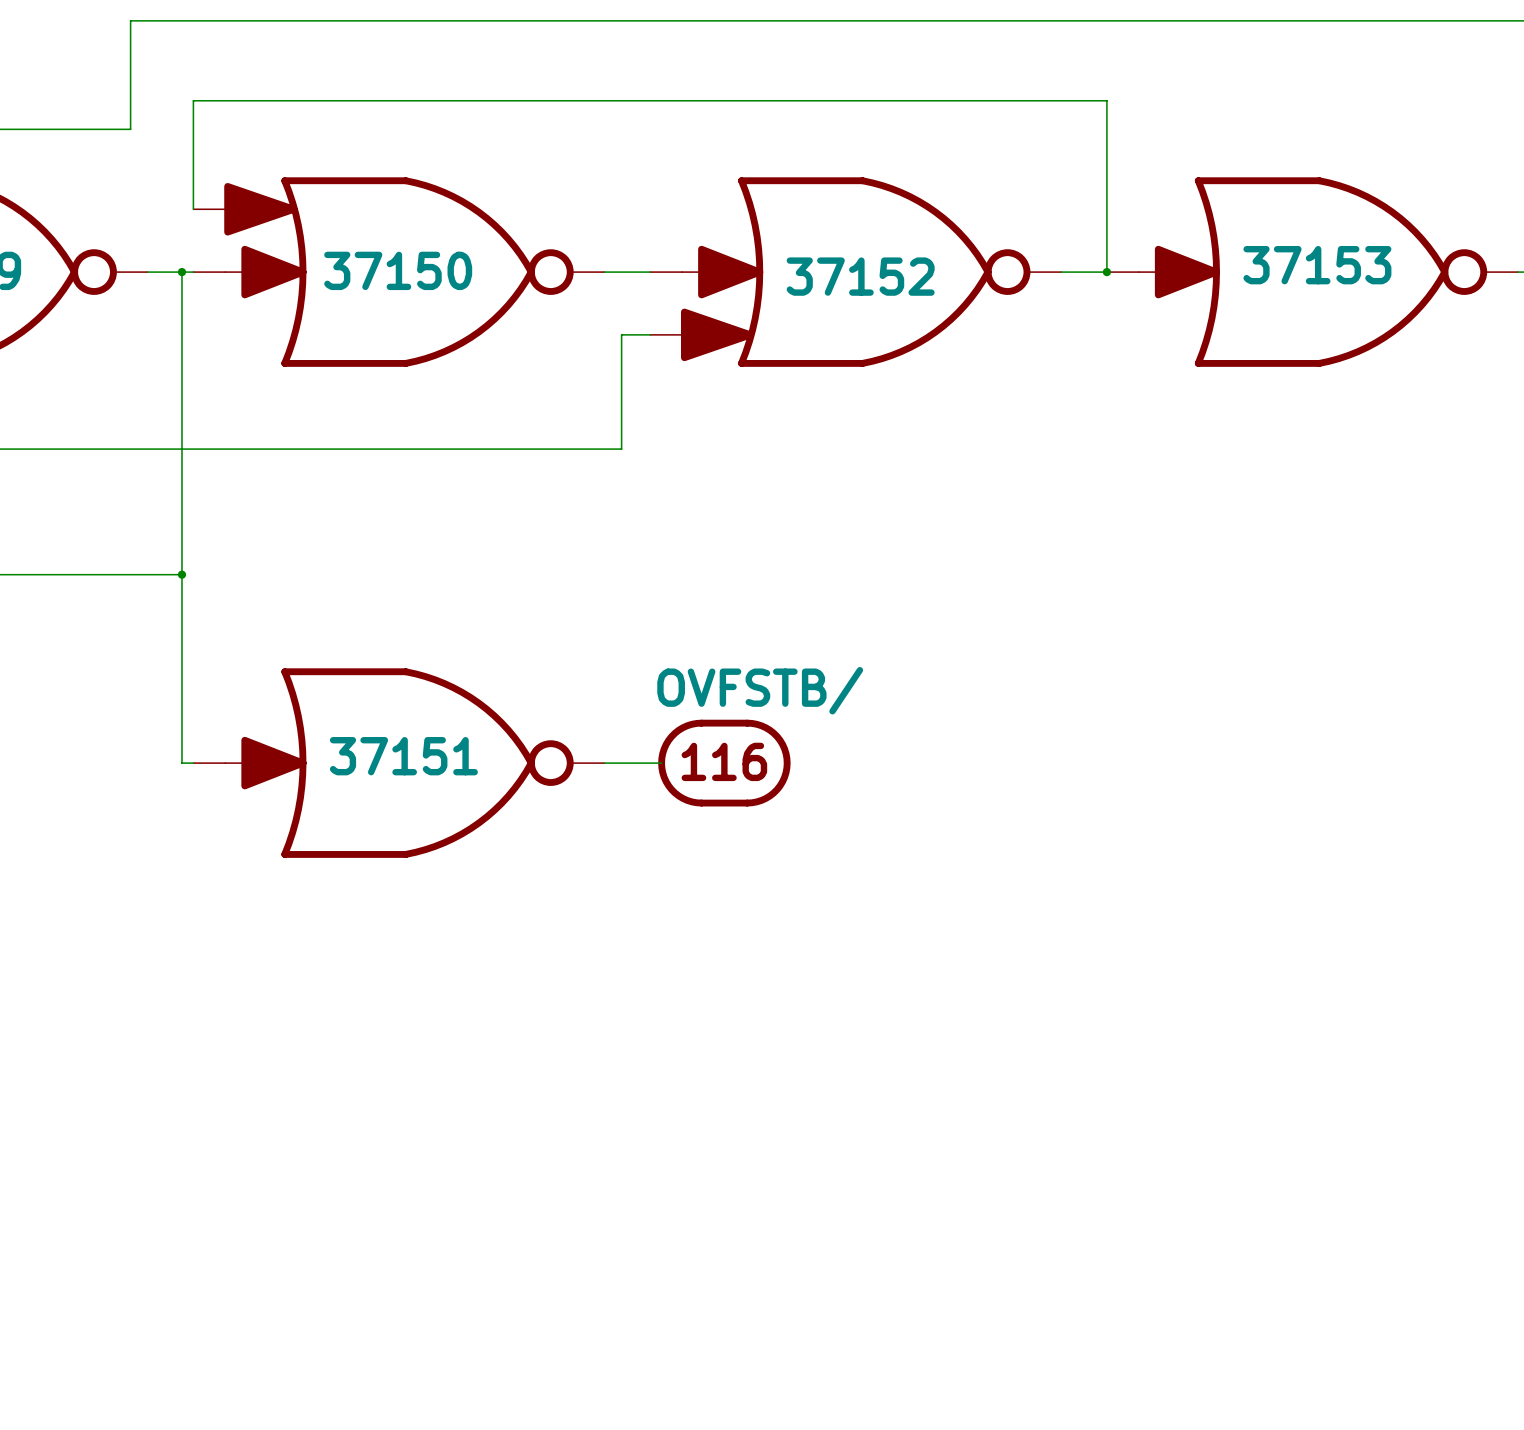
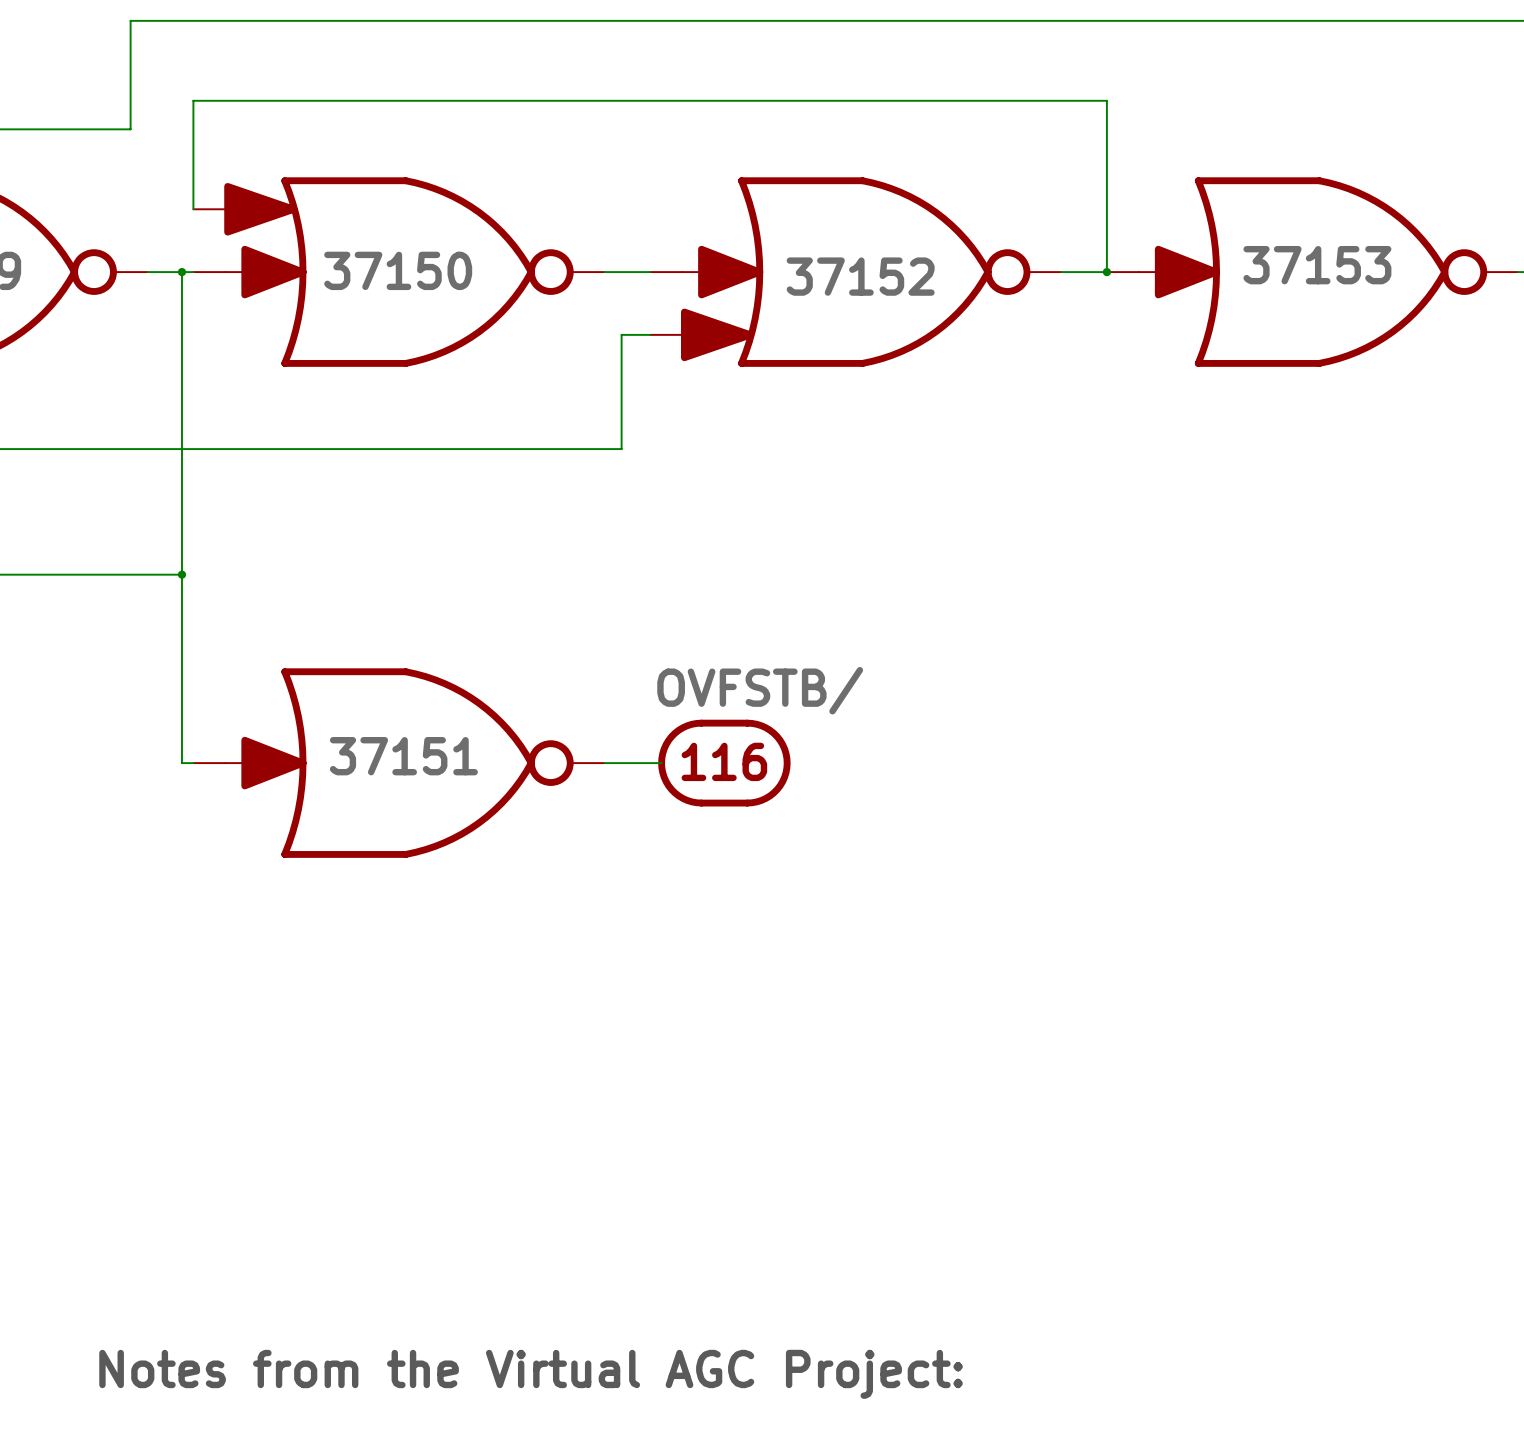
text: none -> Notes from the Virtual AGC Project: (531, 1374)

